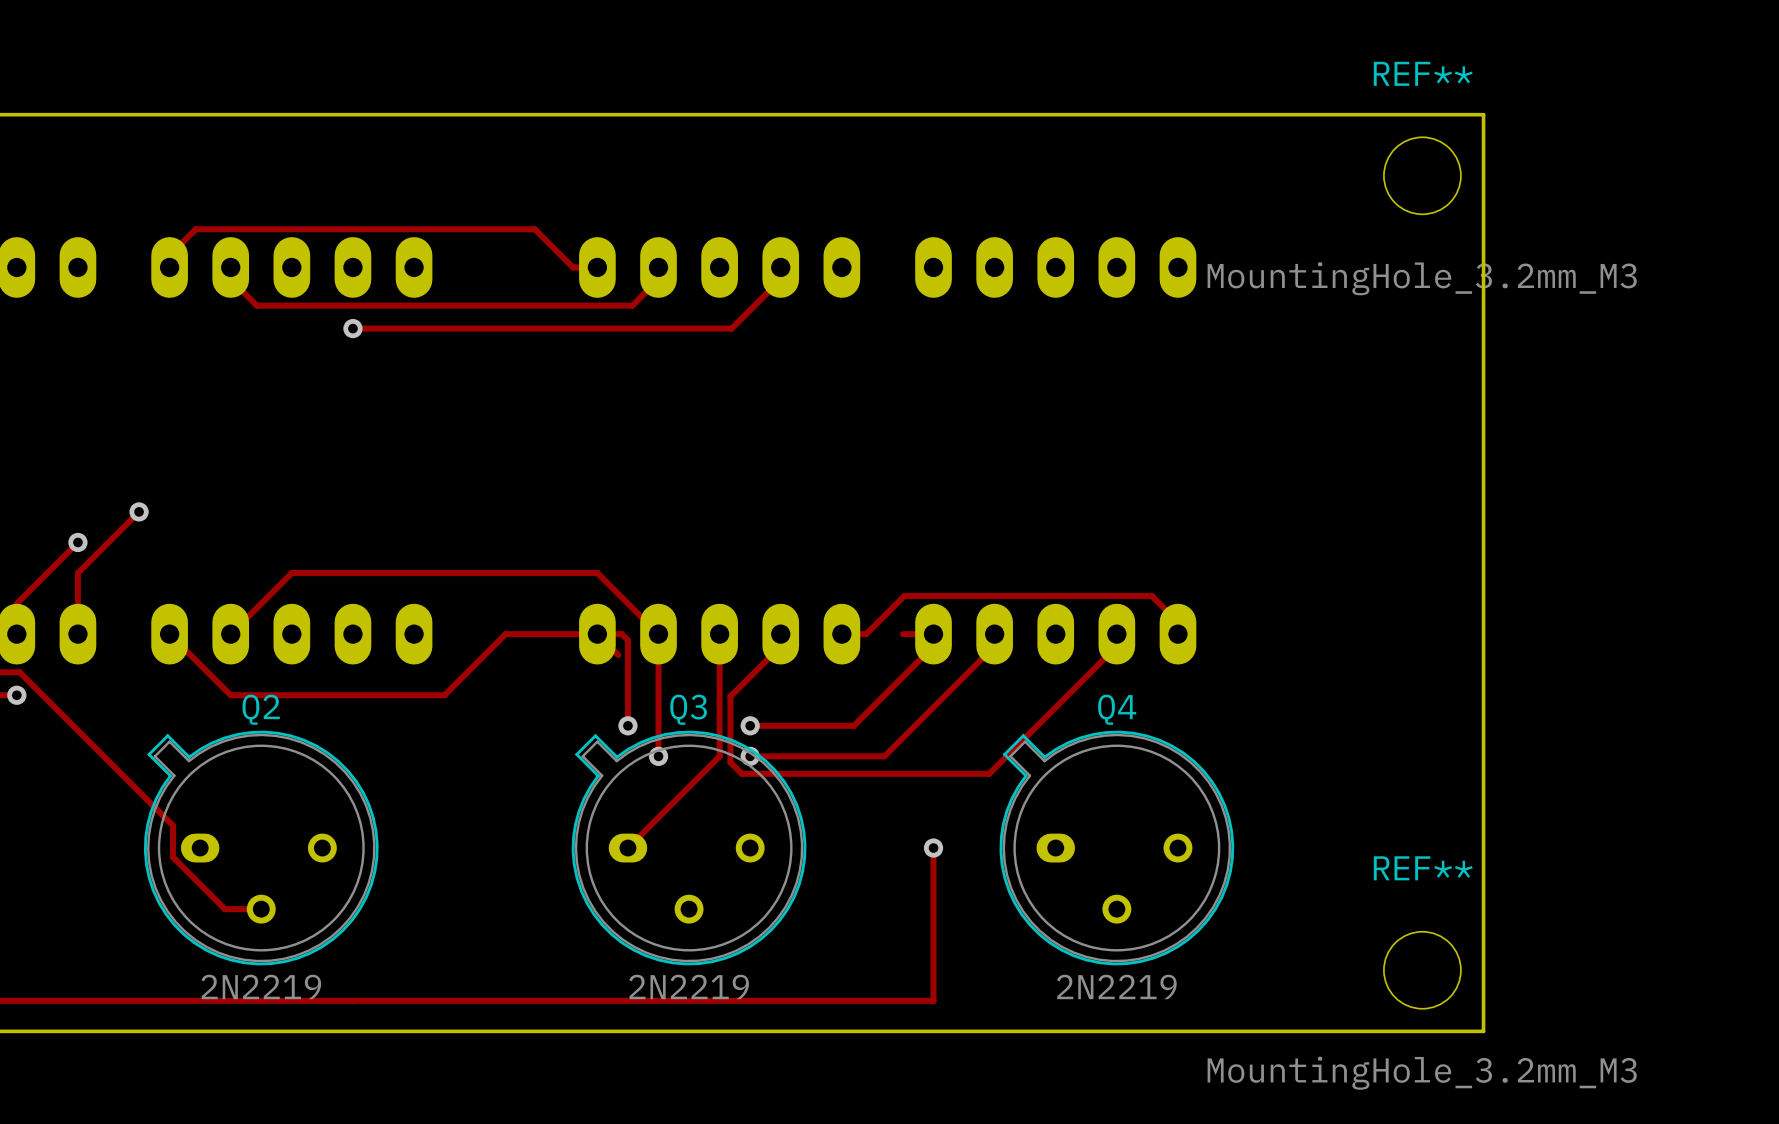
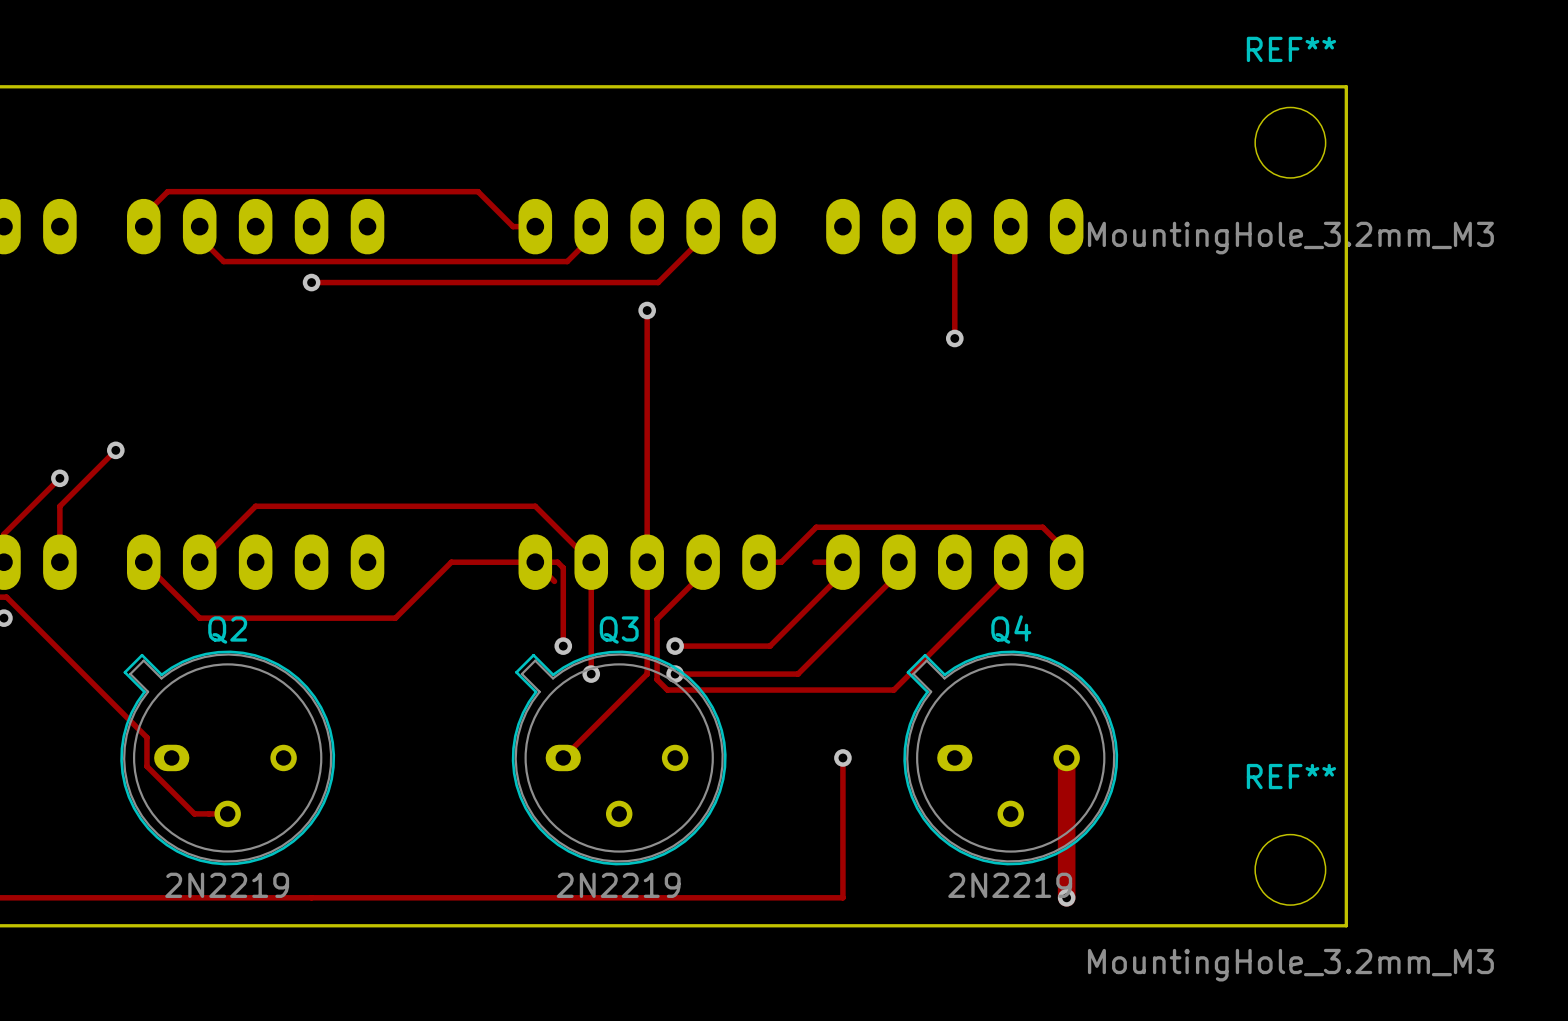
track: none -> (954, 226) (954, 338)
track: none -> (647, 310) (647, 562)
via: none -> (647, 310)
via: none -> (954, 338)
track: none -> (1066, 757) (1066, 897)
via: none -> (1066, 897)

